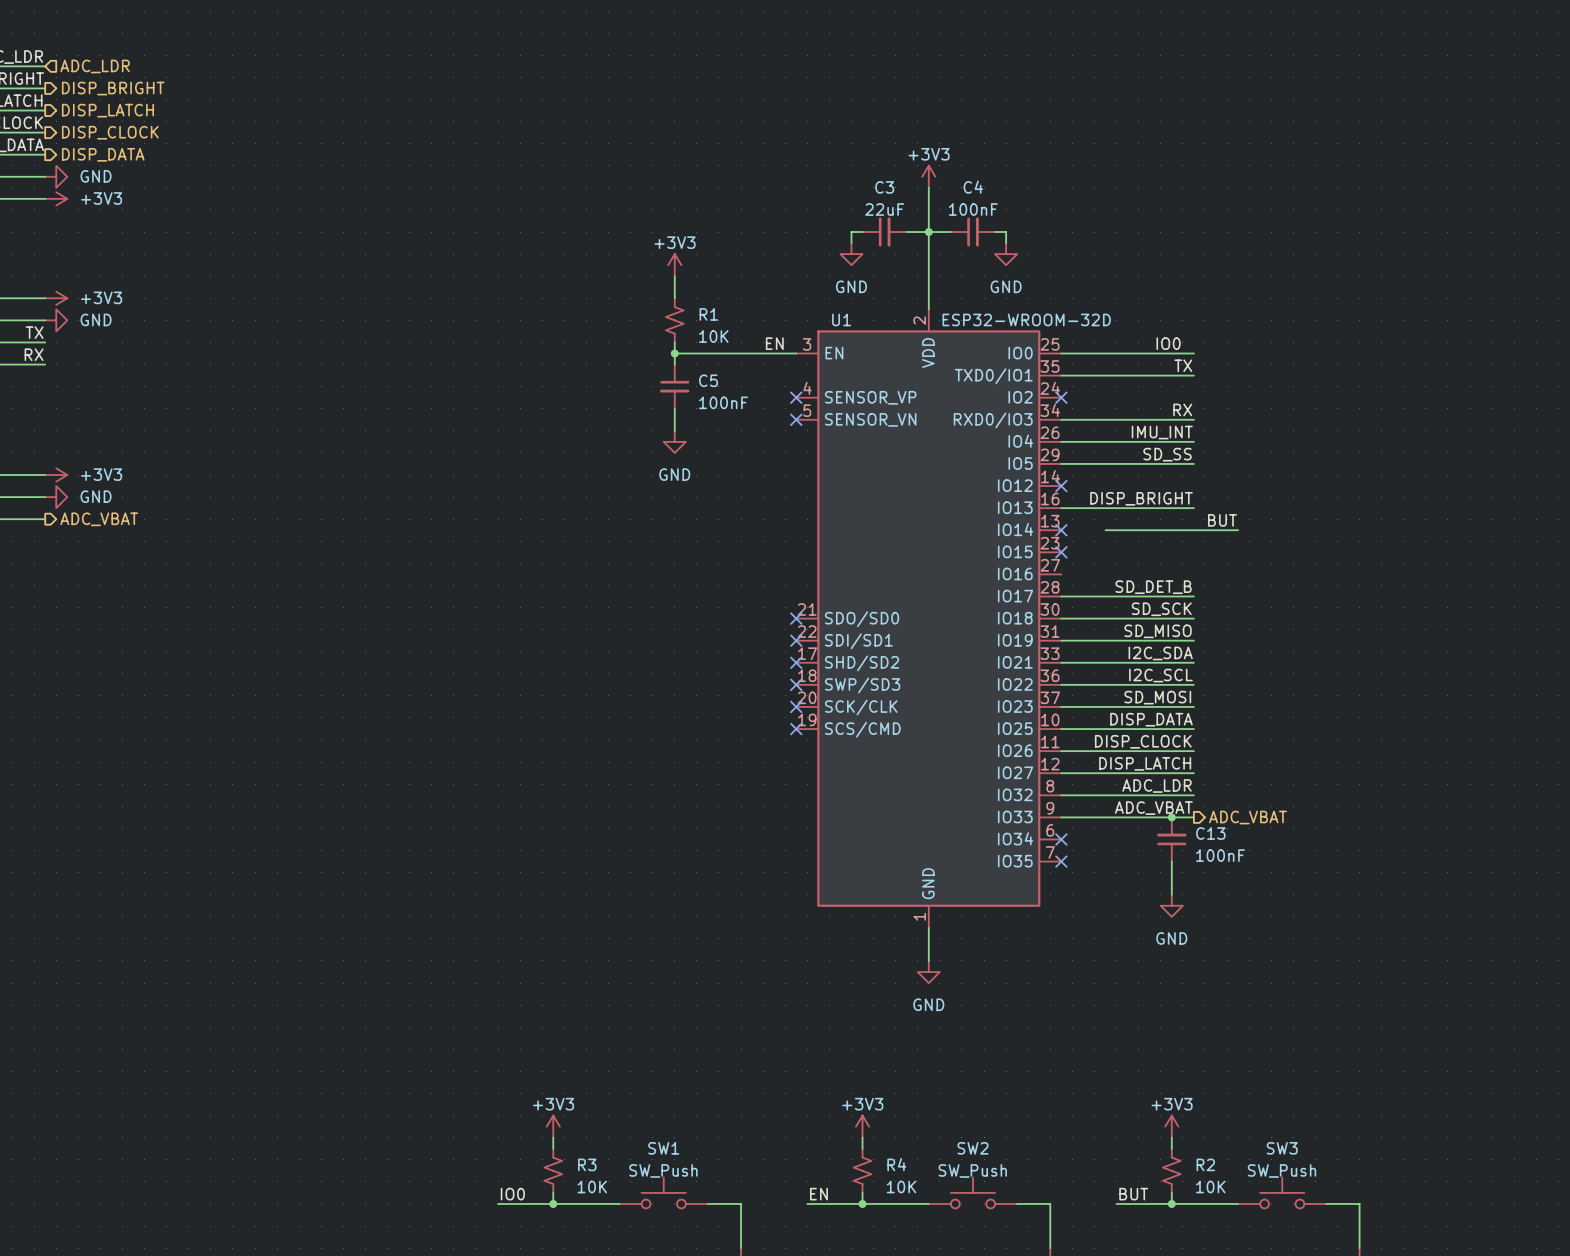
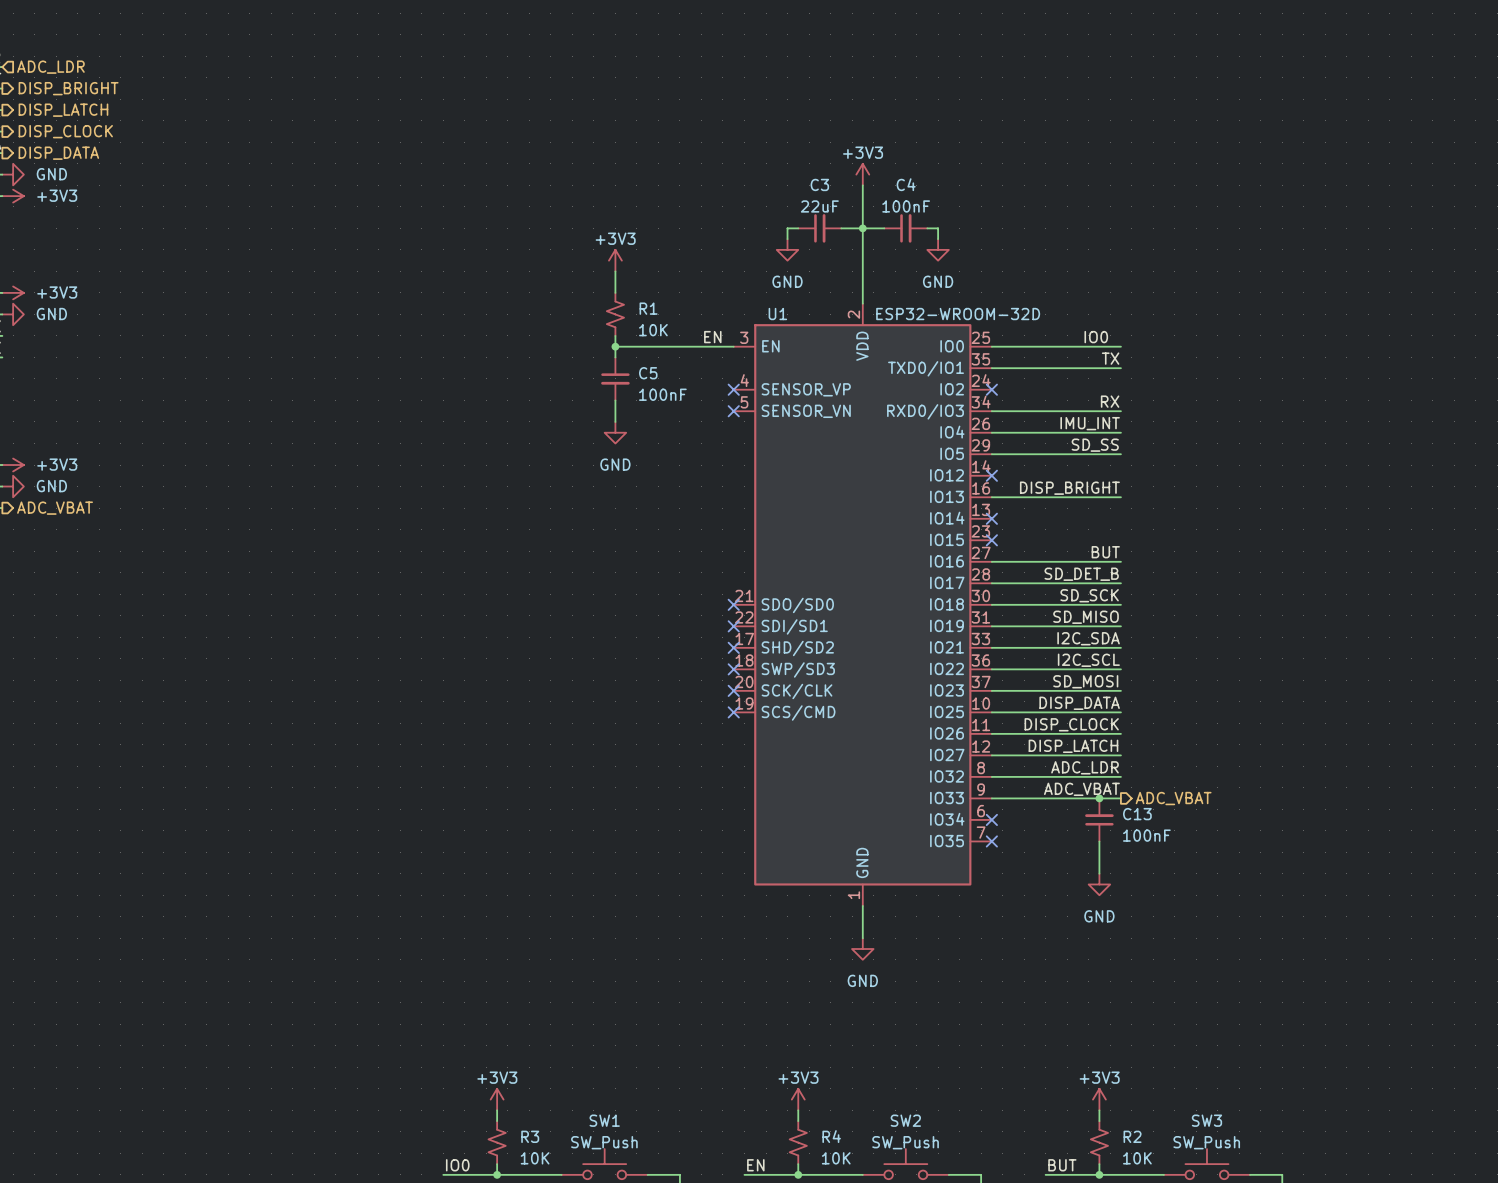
label position: BUT (1222, 520) -> BUT (1105, 552)
wire: (1105, 530) (1238, 530) -> (991, 561) (1120, 561)

